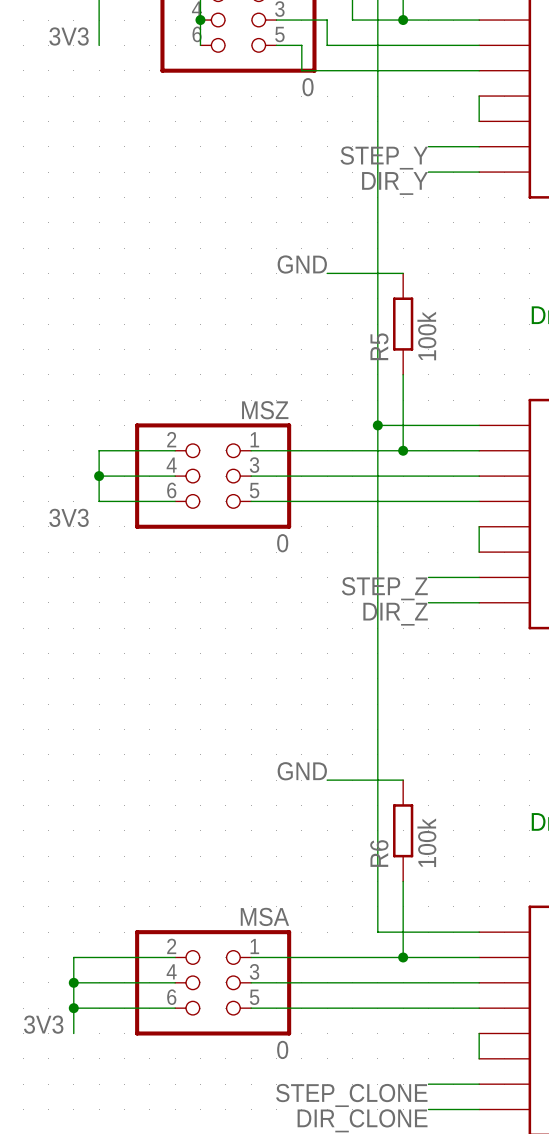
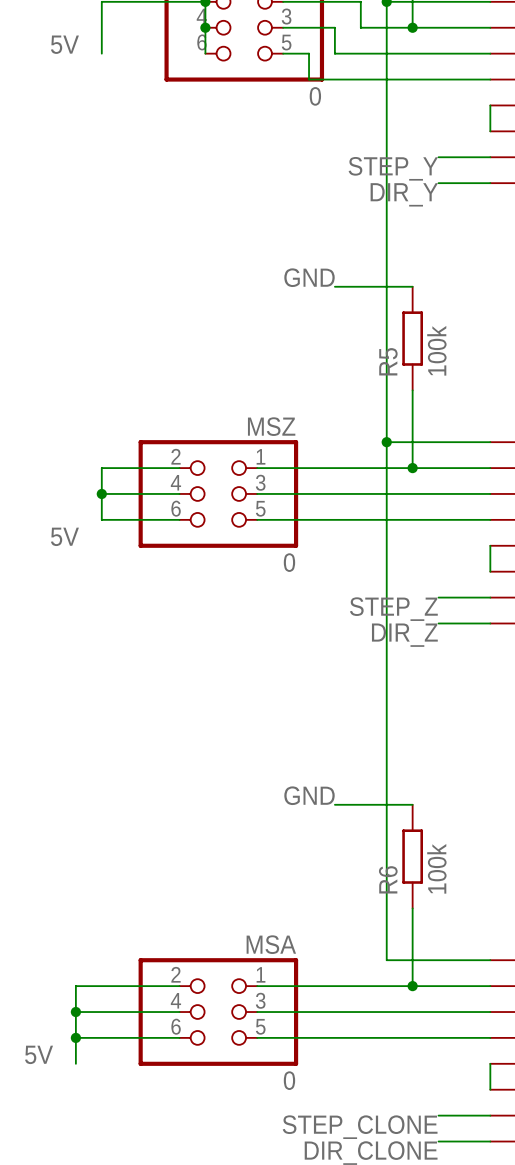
label: 3V3 (69, 36) -> 5V (64, 44)
label: 3V3 (69, 517) -> 5V (64, 536)
label: 3V3 (43, 1024) -> 5V (39, 1054)

